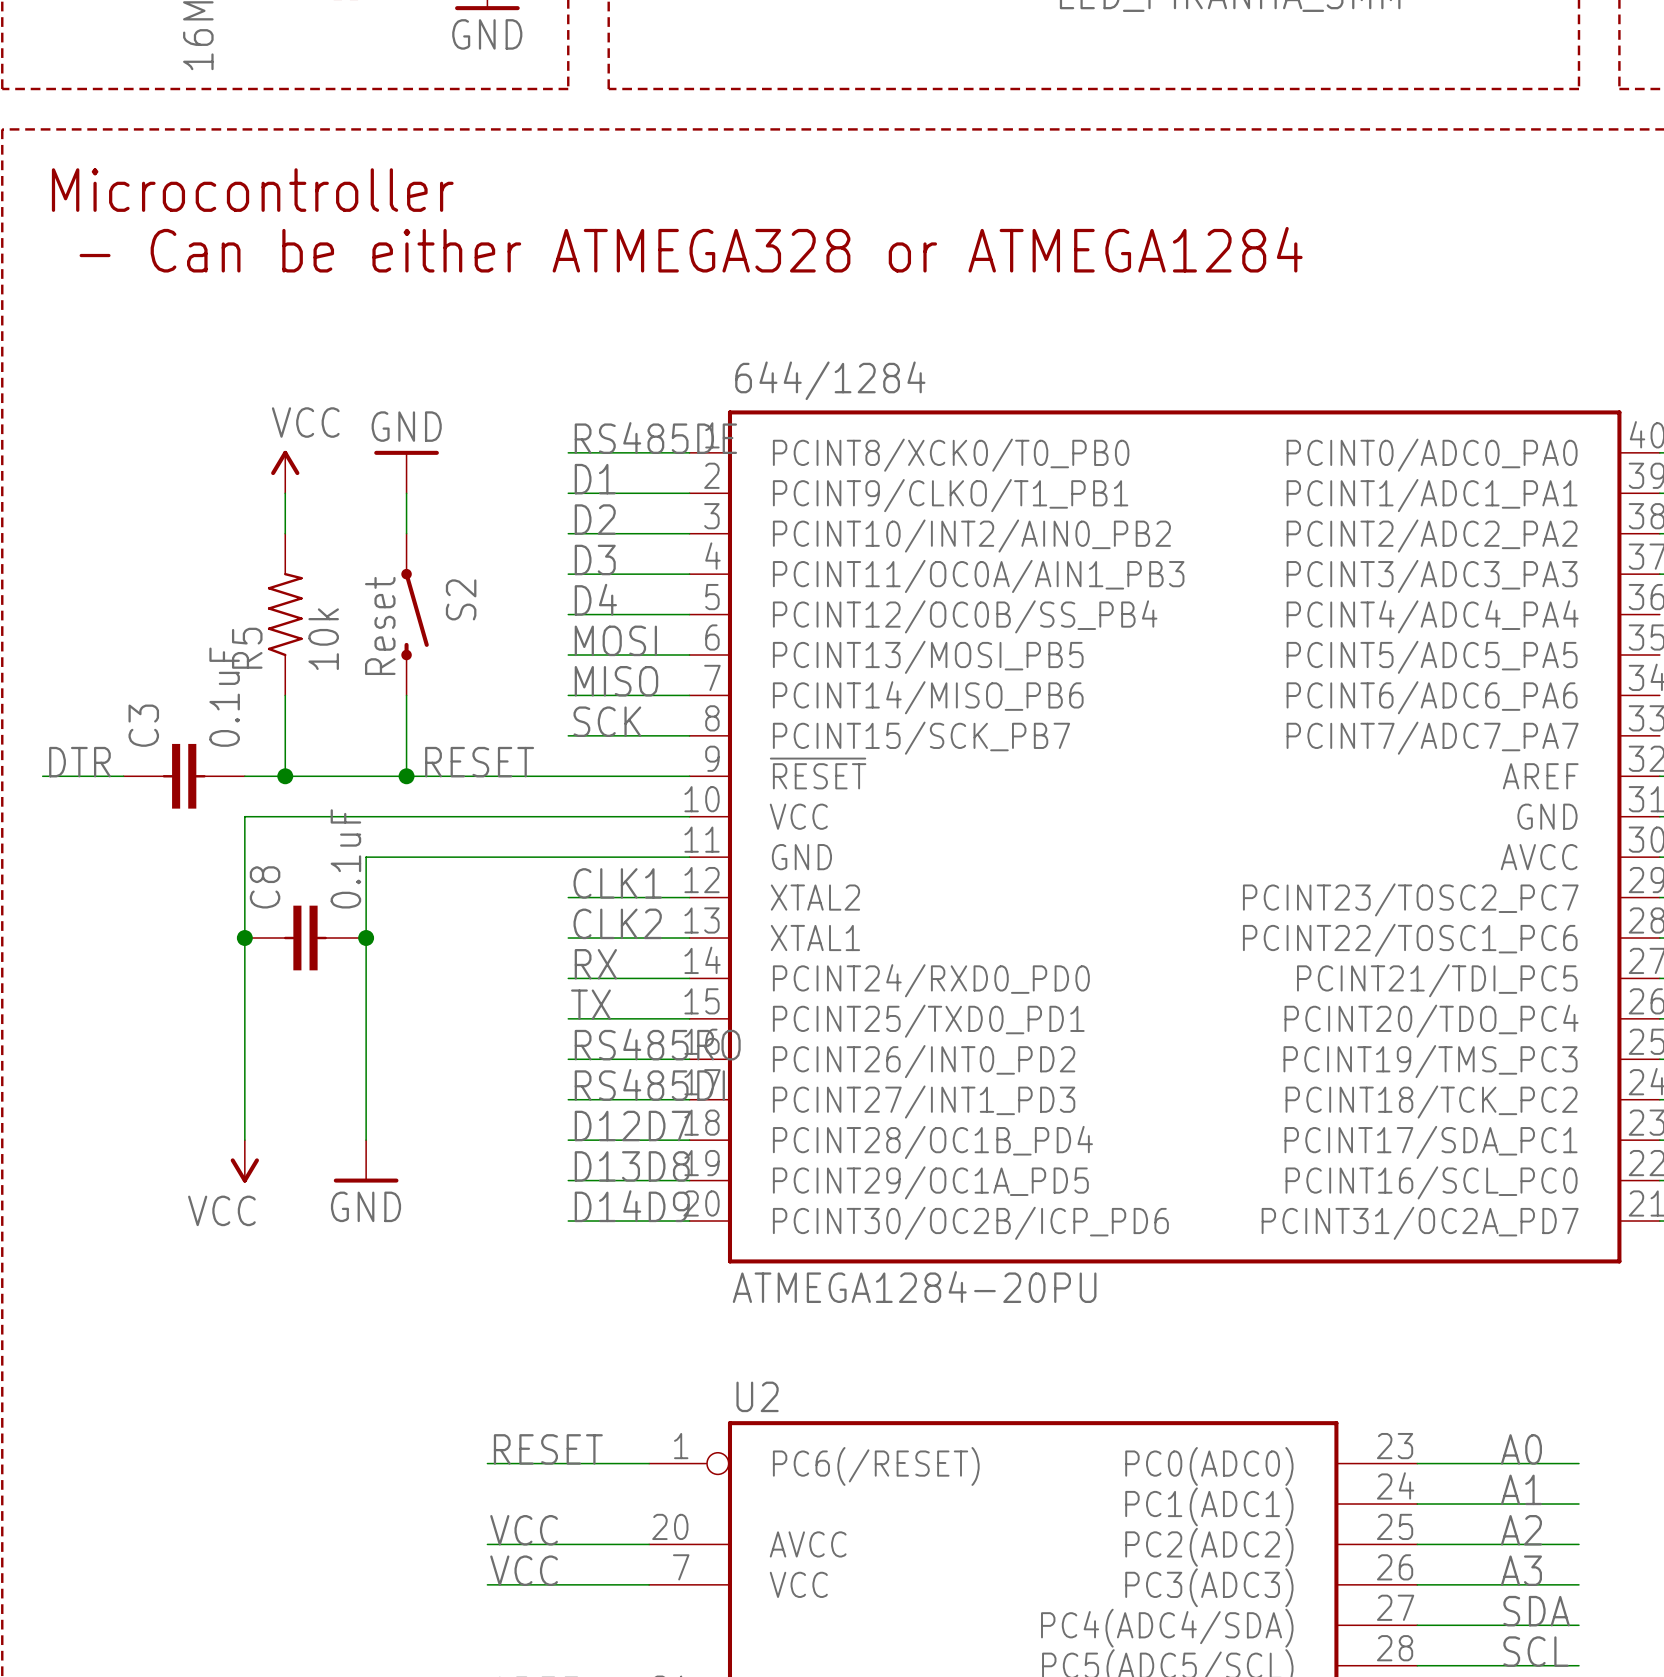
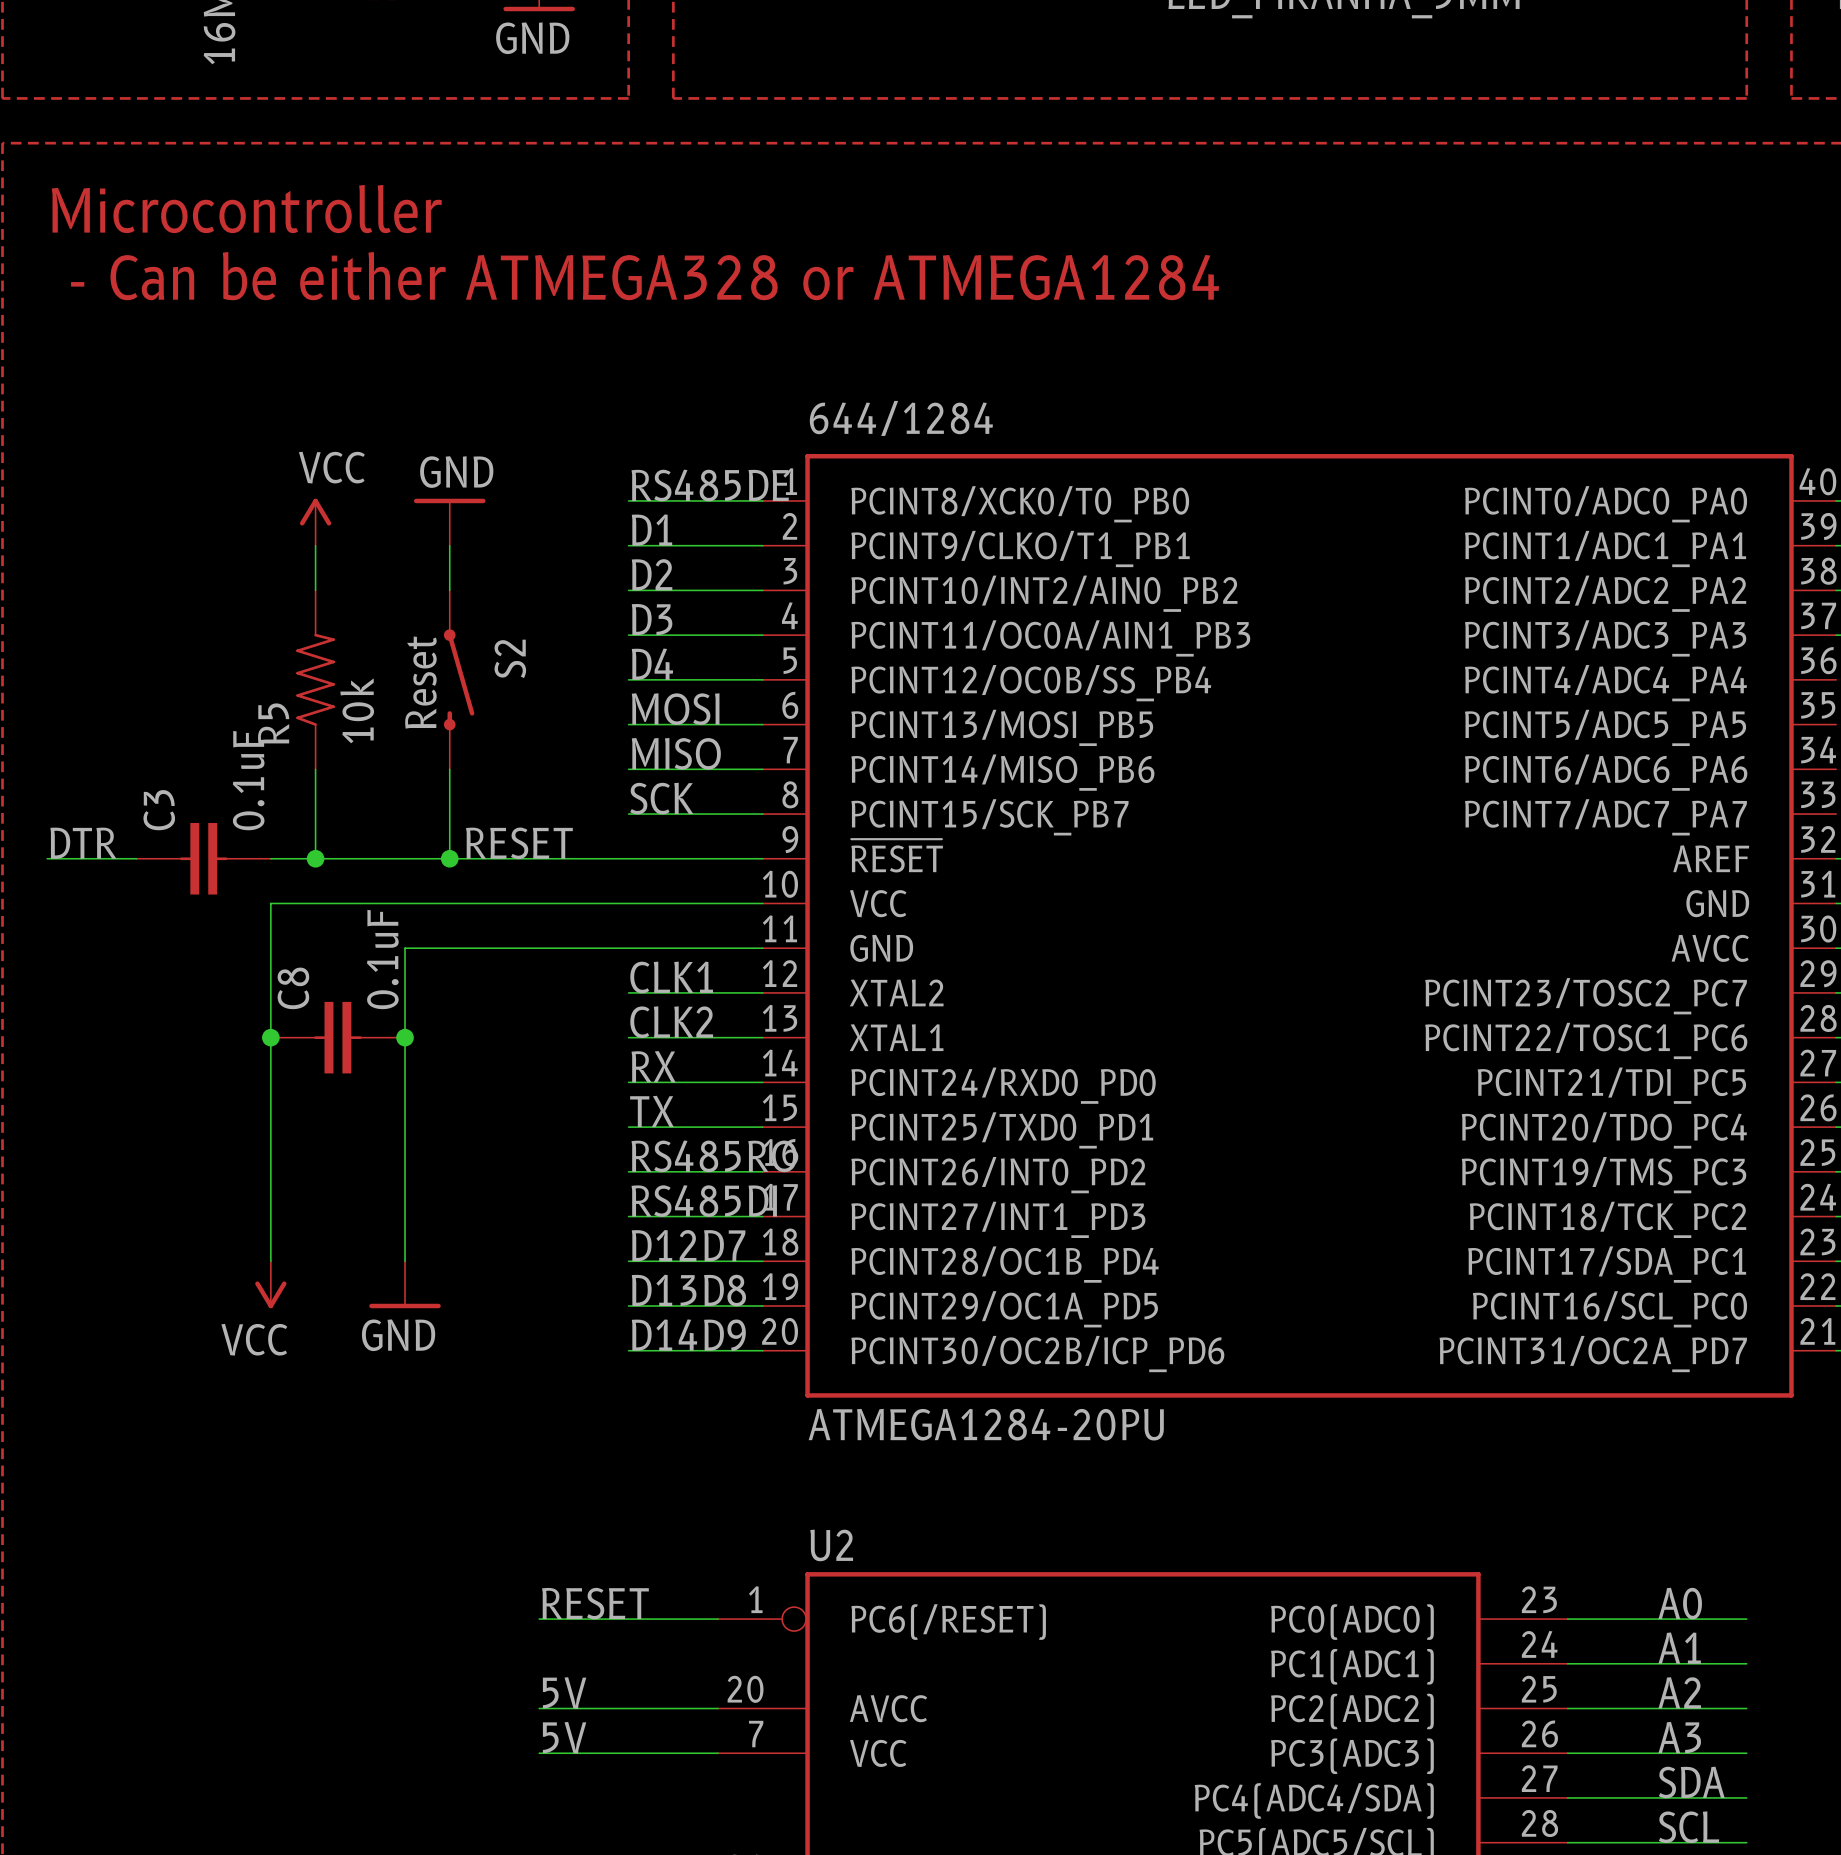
label: VCC (524, 1530) -> 5V (564, 1693)
label: VCC (524, 1570) -> 5V (564, 1737)

